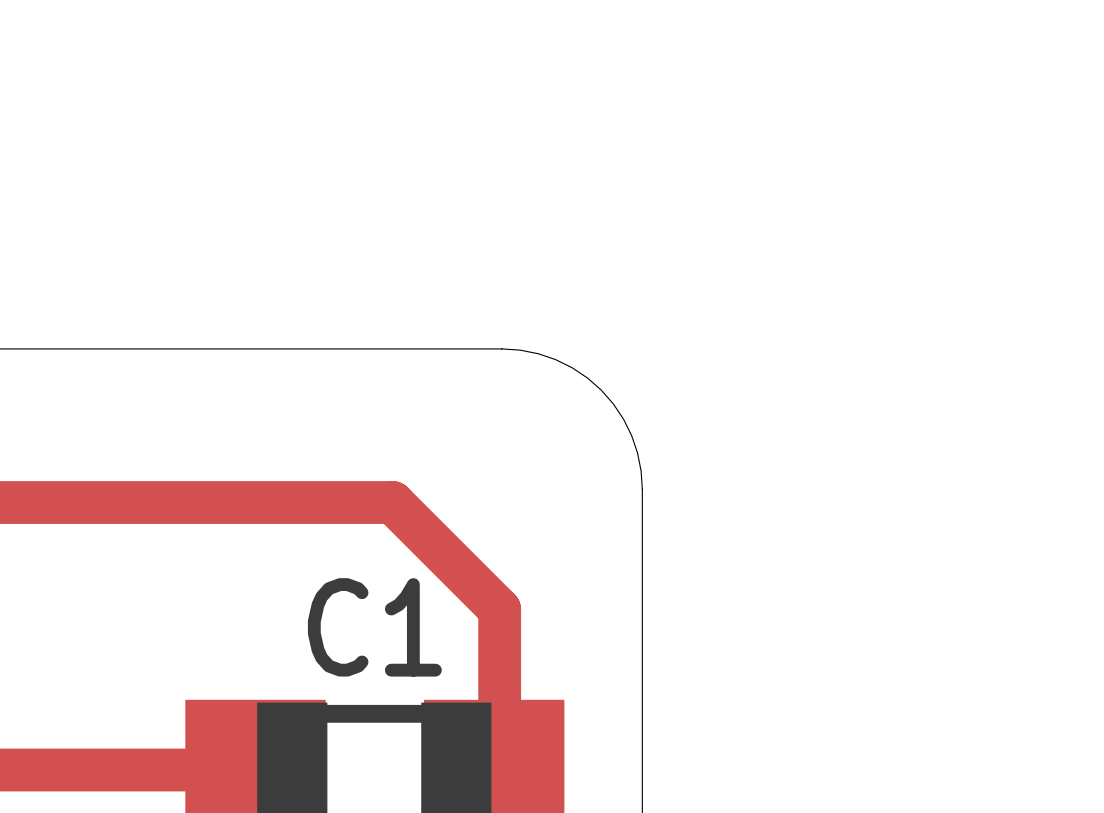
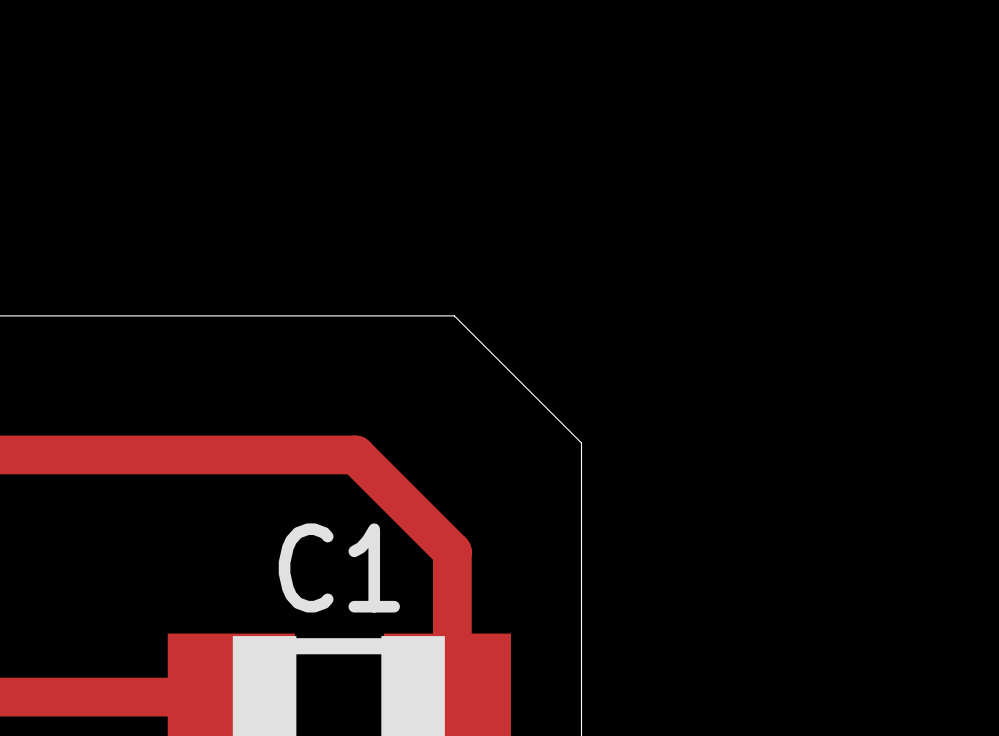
board edge: (501, 348) (538, 353) (555, 359) (587, 377) (601, 390) (613, 403) (631, 435) (637, 453) (642, 489) -> (454, 315) (581, 443)

